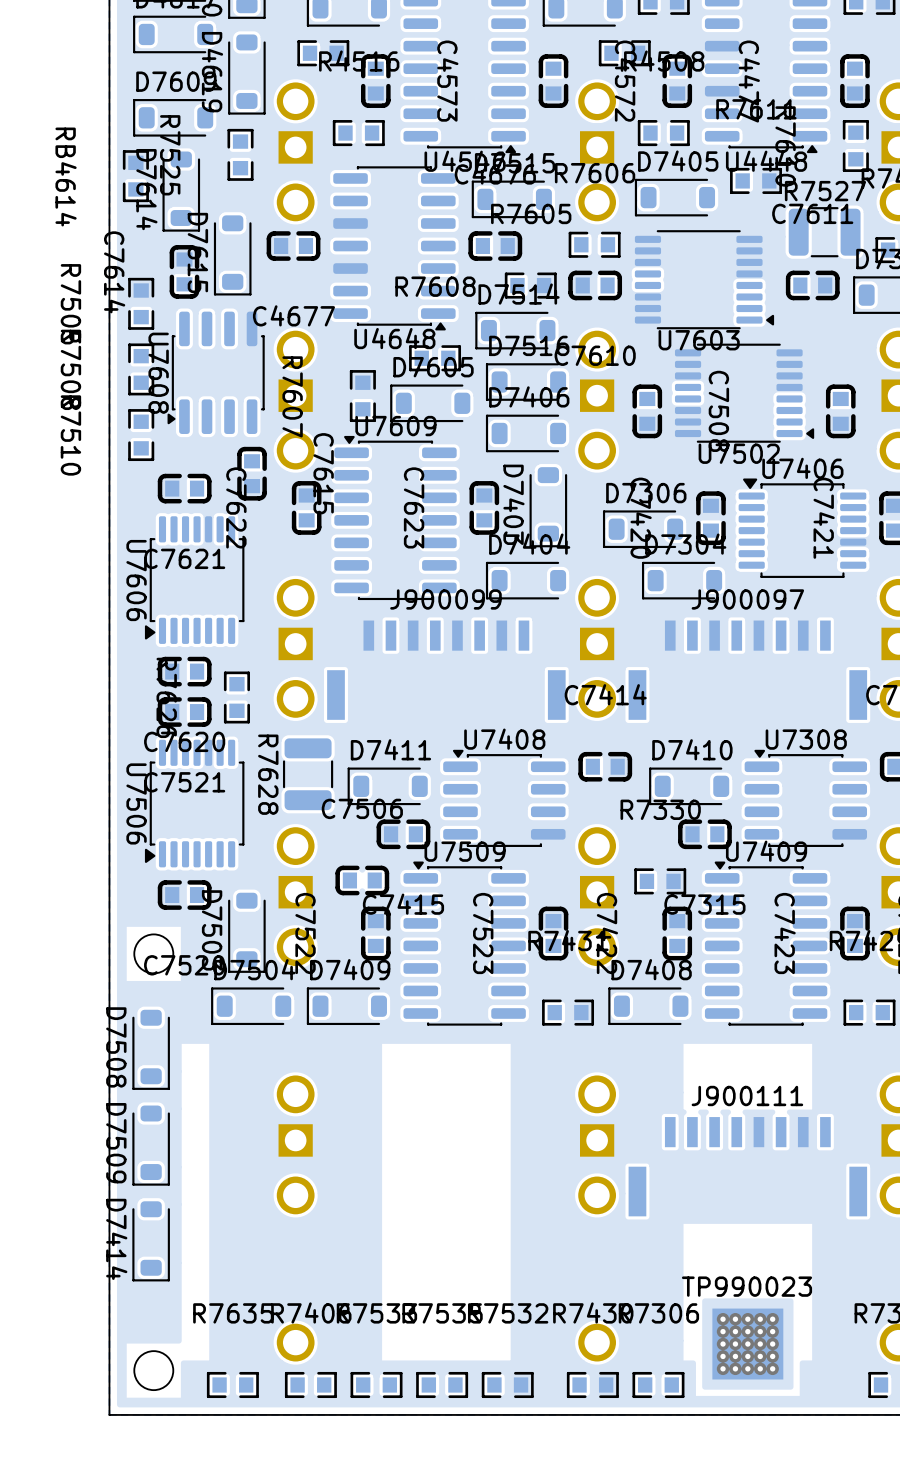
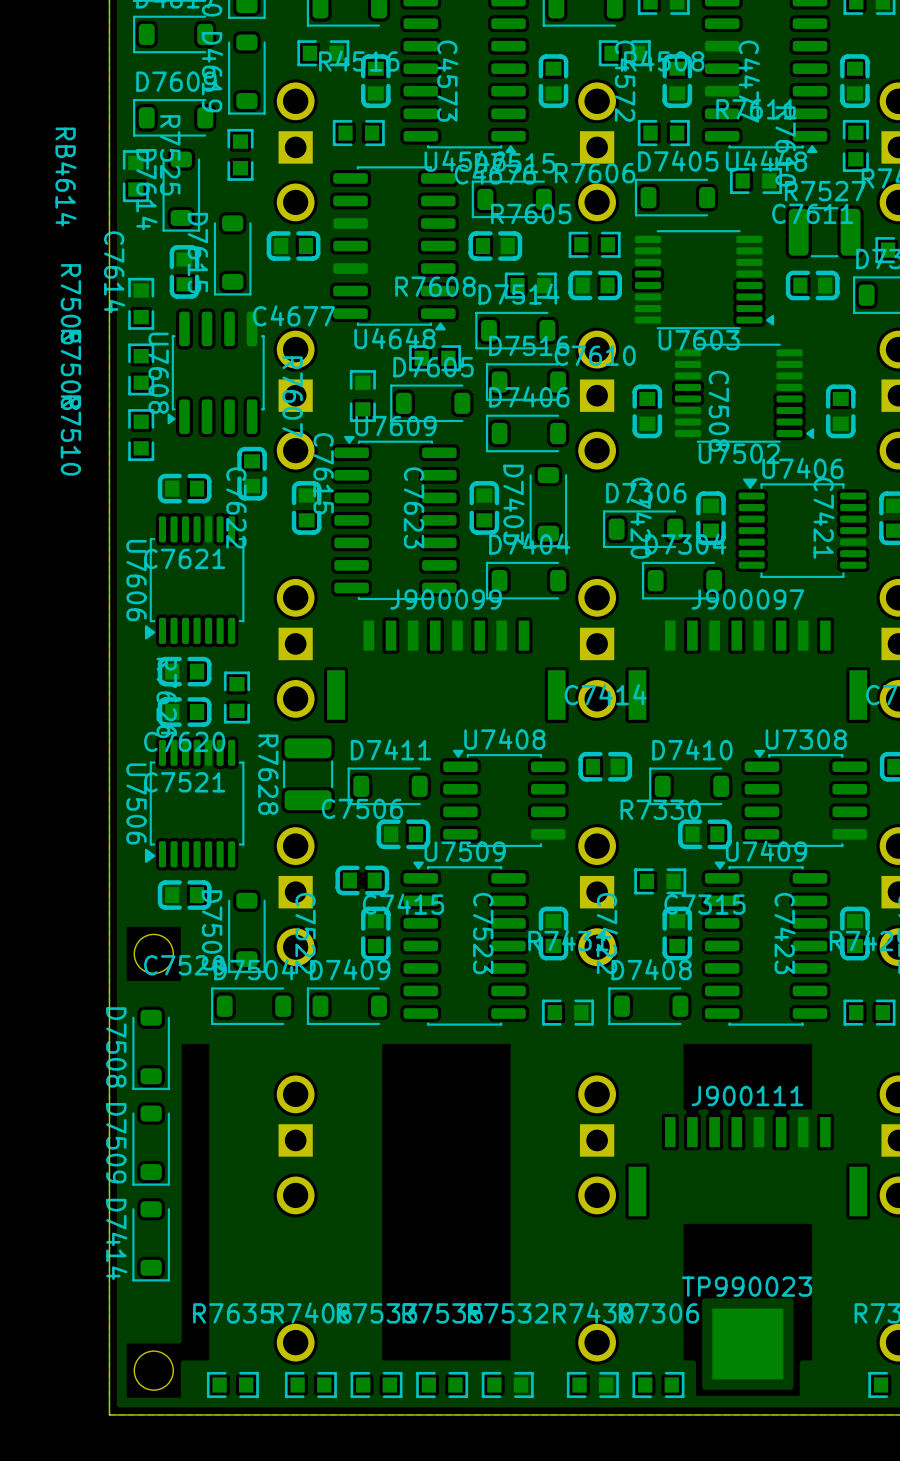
via: (723, 1319) -> none
via: (735, 1319) -> none
via: (747, 1319) -> none
via: (760, 1319) -> none
via: (772, 1319) -> none
via: (723, 1331) -> none
via: (735, 1331) -> none
via: (747, 1331) -> none
via: (760, 1331) -> none
via: (772, 1331) -> none
via: (723, 1344) -> none
via: (735, 1344) -> none
via: (747, 1344) -> none
via: (760, 1344) -> none
via: (772, 1344) -> none
via: (723, 1356) -> none
via: (735, 1356) -> none
via: (747, 1356) -> none
via: (760, 1356) -> none
via: (772, 1356) -> none
via: (723, 1368) -> none
via: (735, 1368) -> none
via: (747, 1368) -> none
via: (760, 1368) -> none
via: (772, 1368) -> none

